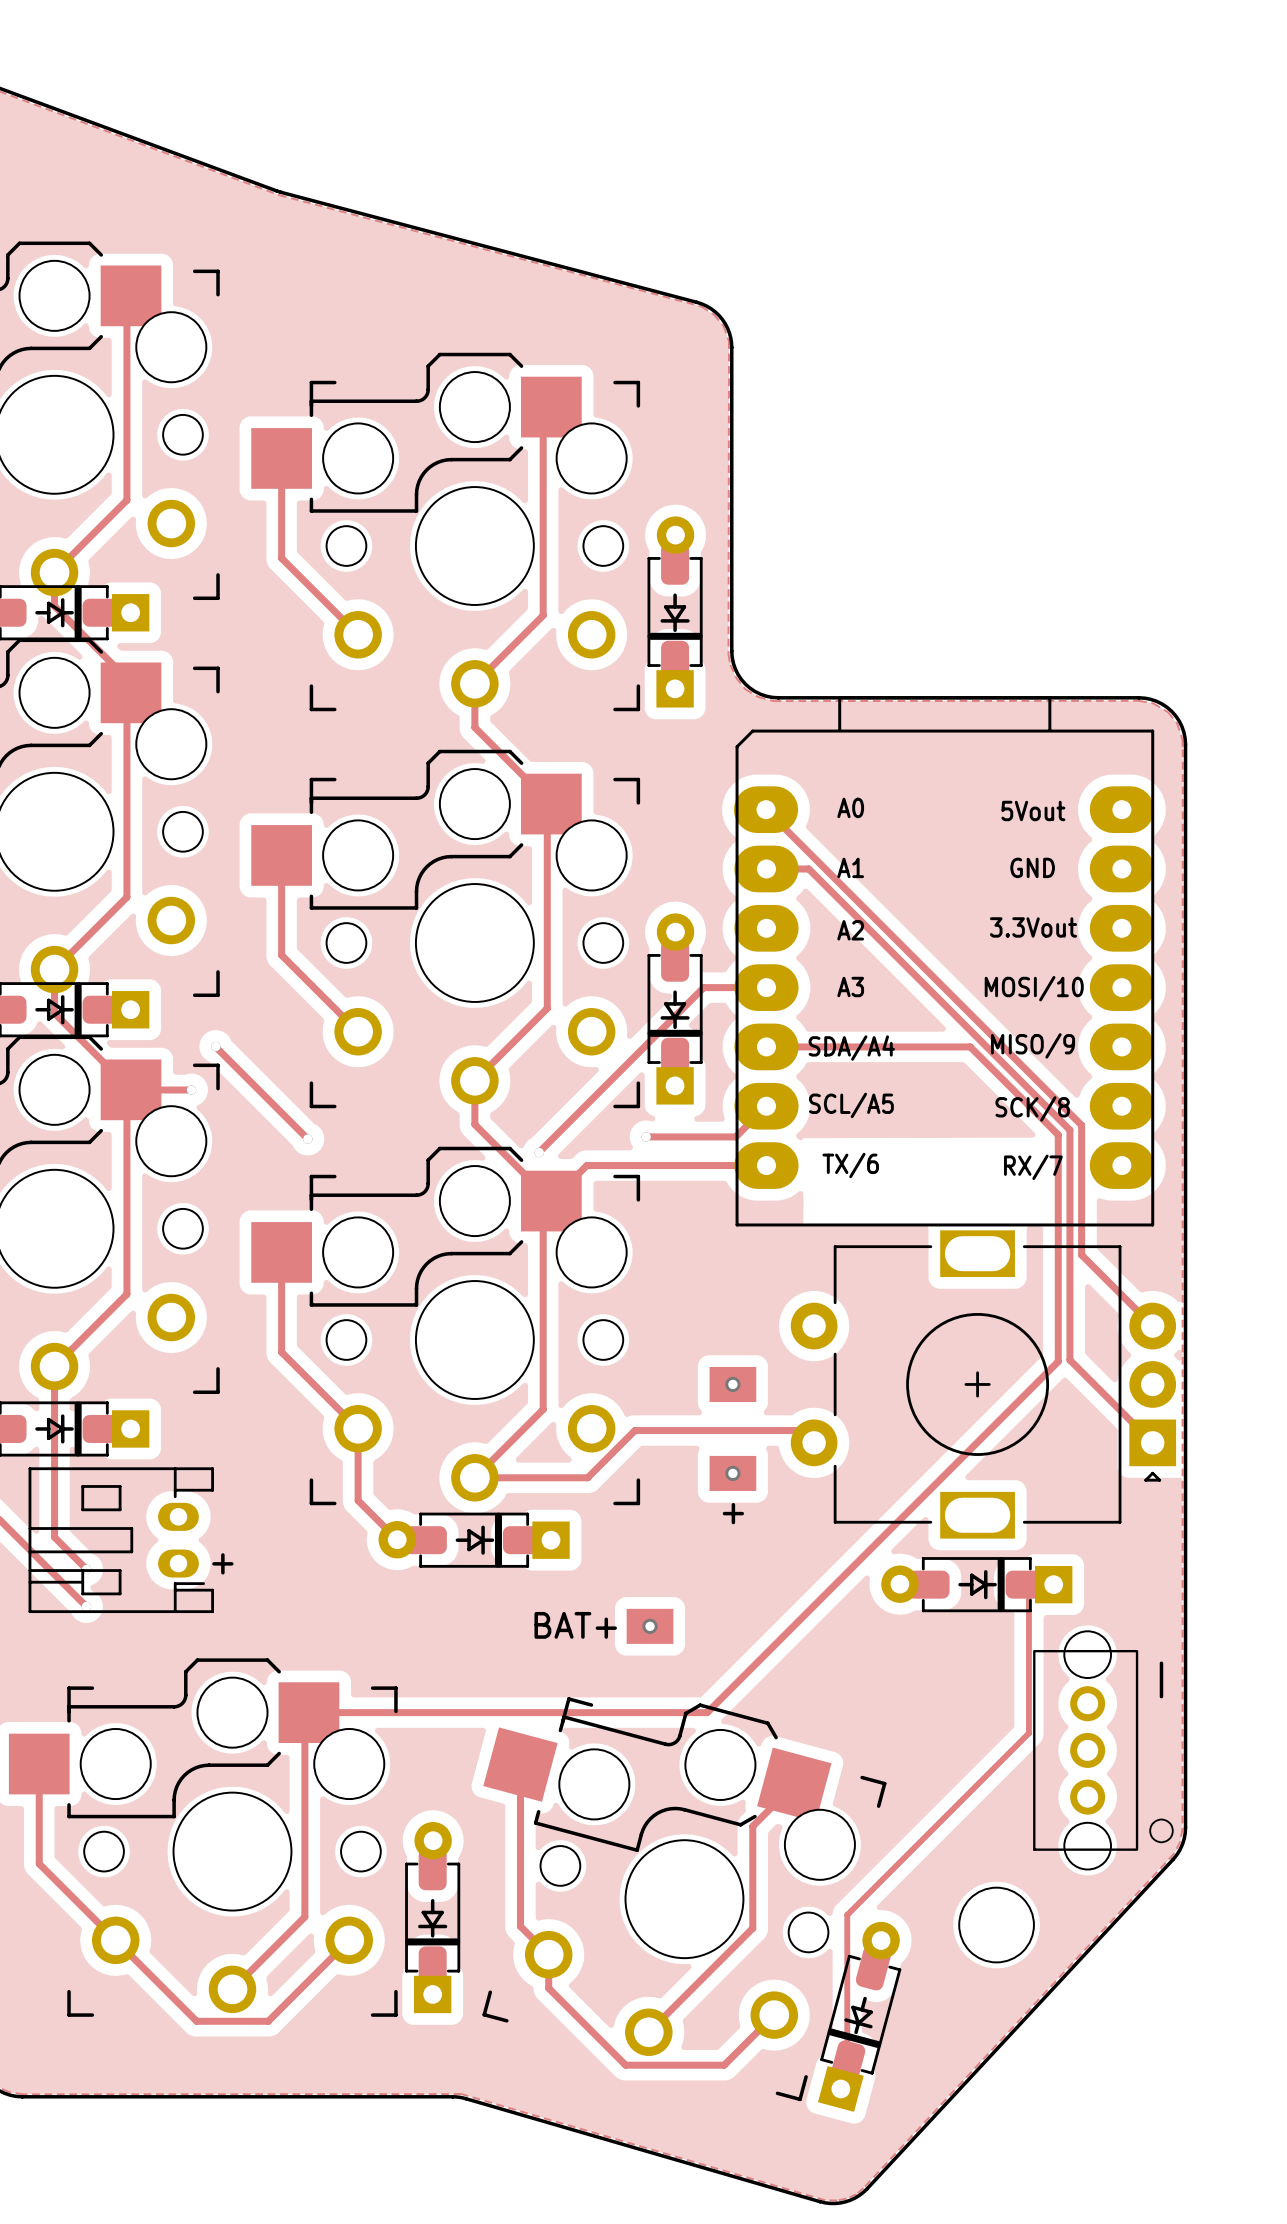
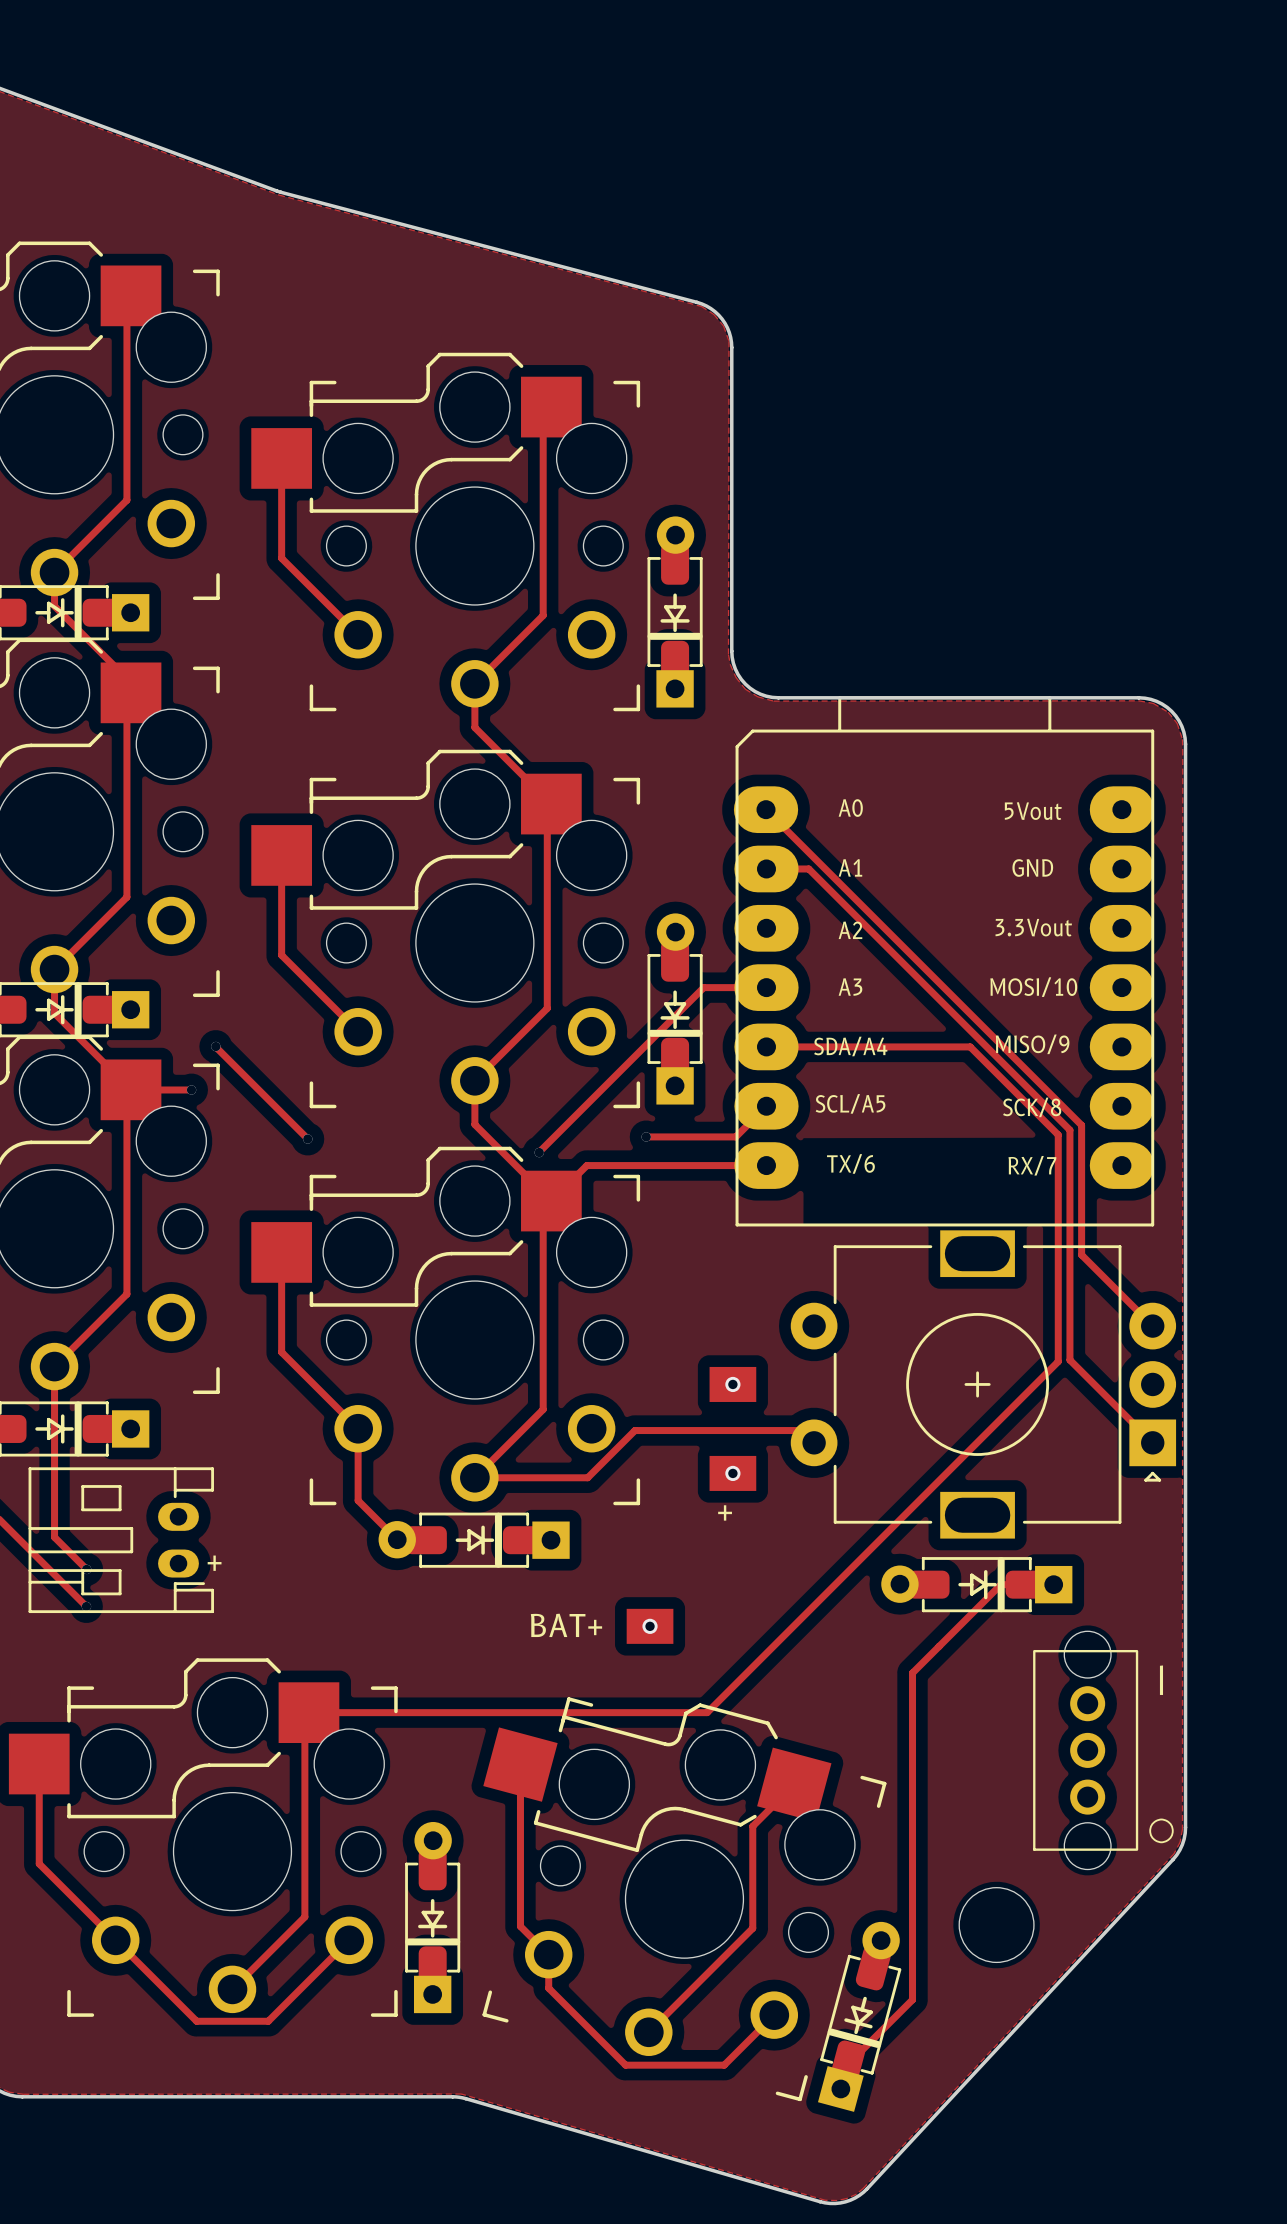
track: (1028, 1584) (1028, 1733) (847, 1914) (847, 2065) -> (1028, 1584) (1000, 1584) (912, 1673) (912, 1999) (847, 2065)

